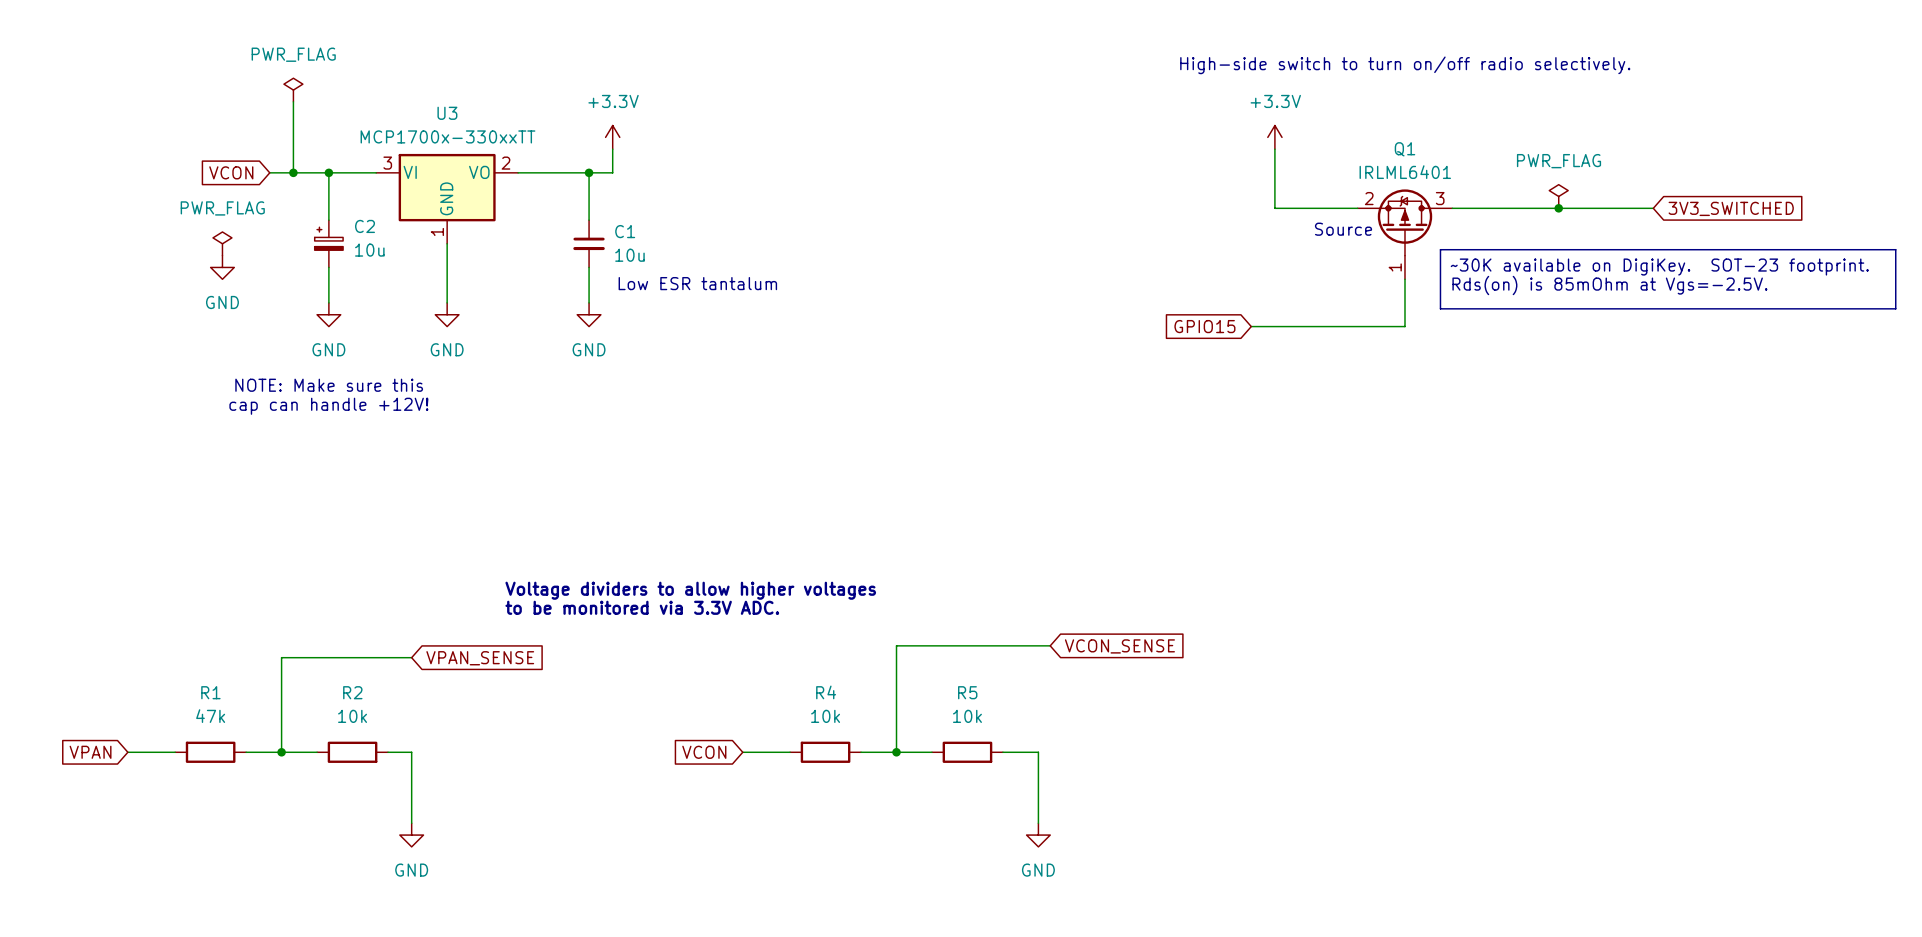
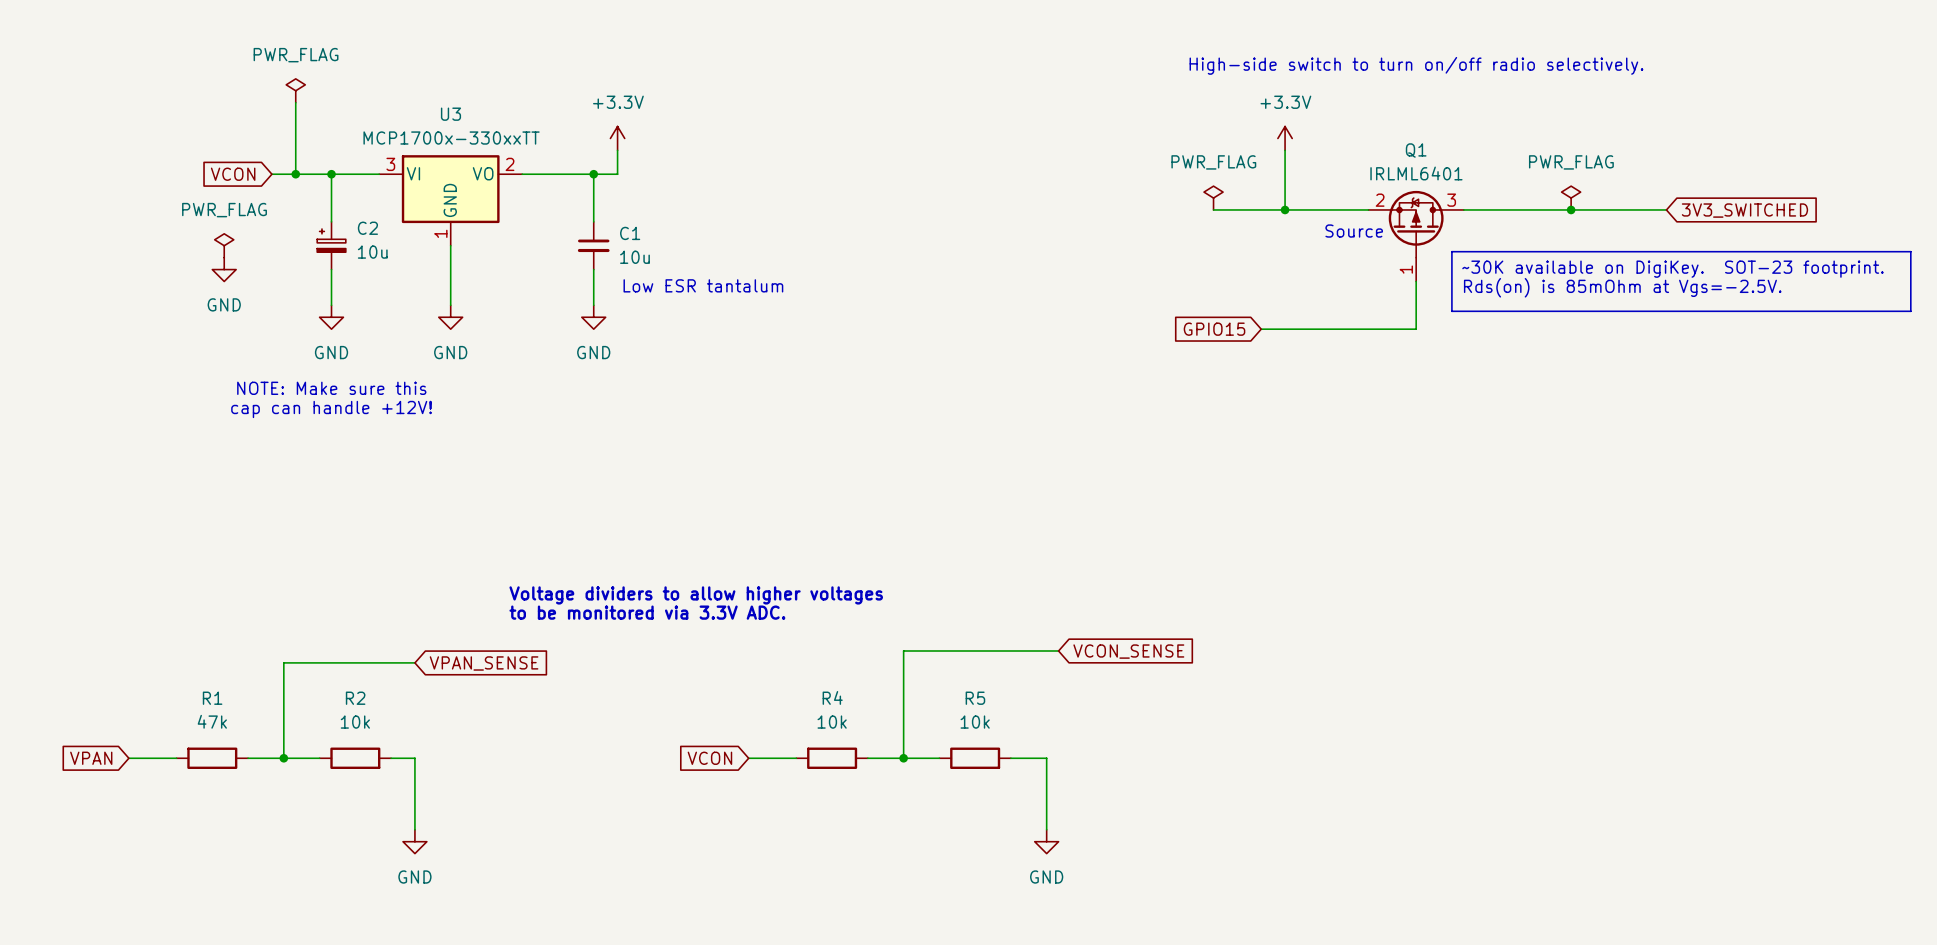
power symbol: none -> PWR_FLAG (1213, 198)
wire: none -> (1213, 209) (1285, 209)
junction: none -> (1285, 209)

